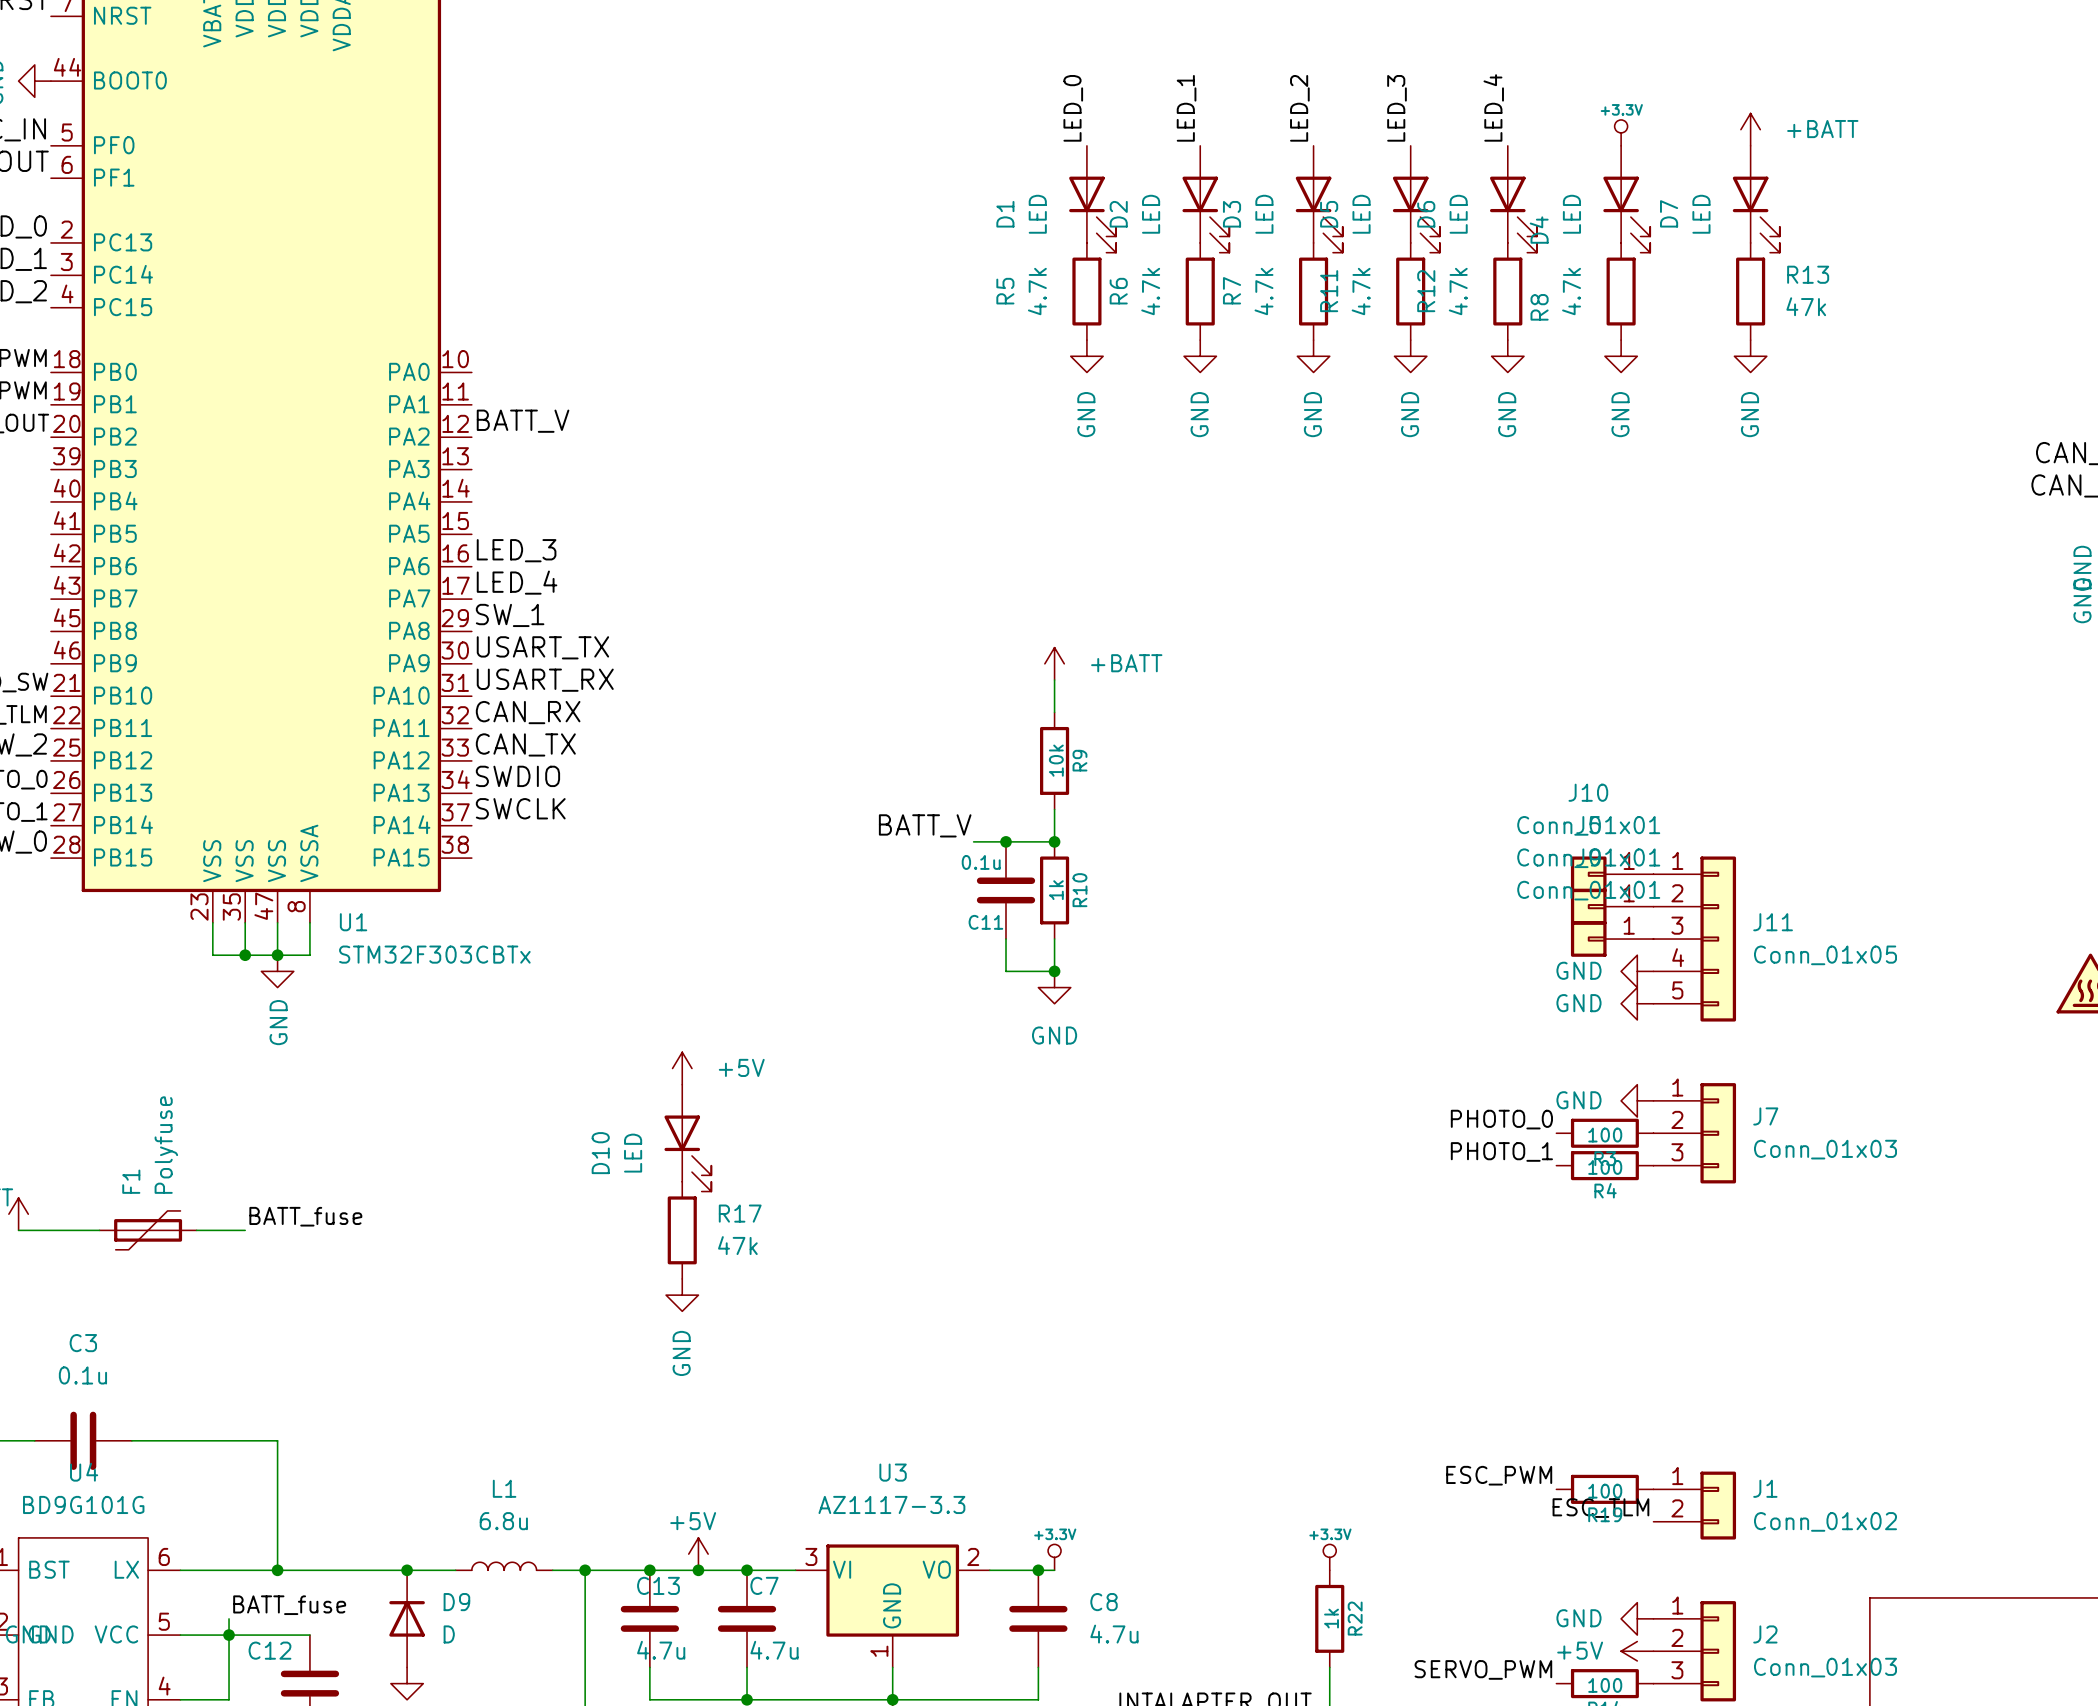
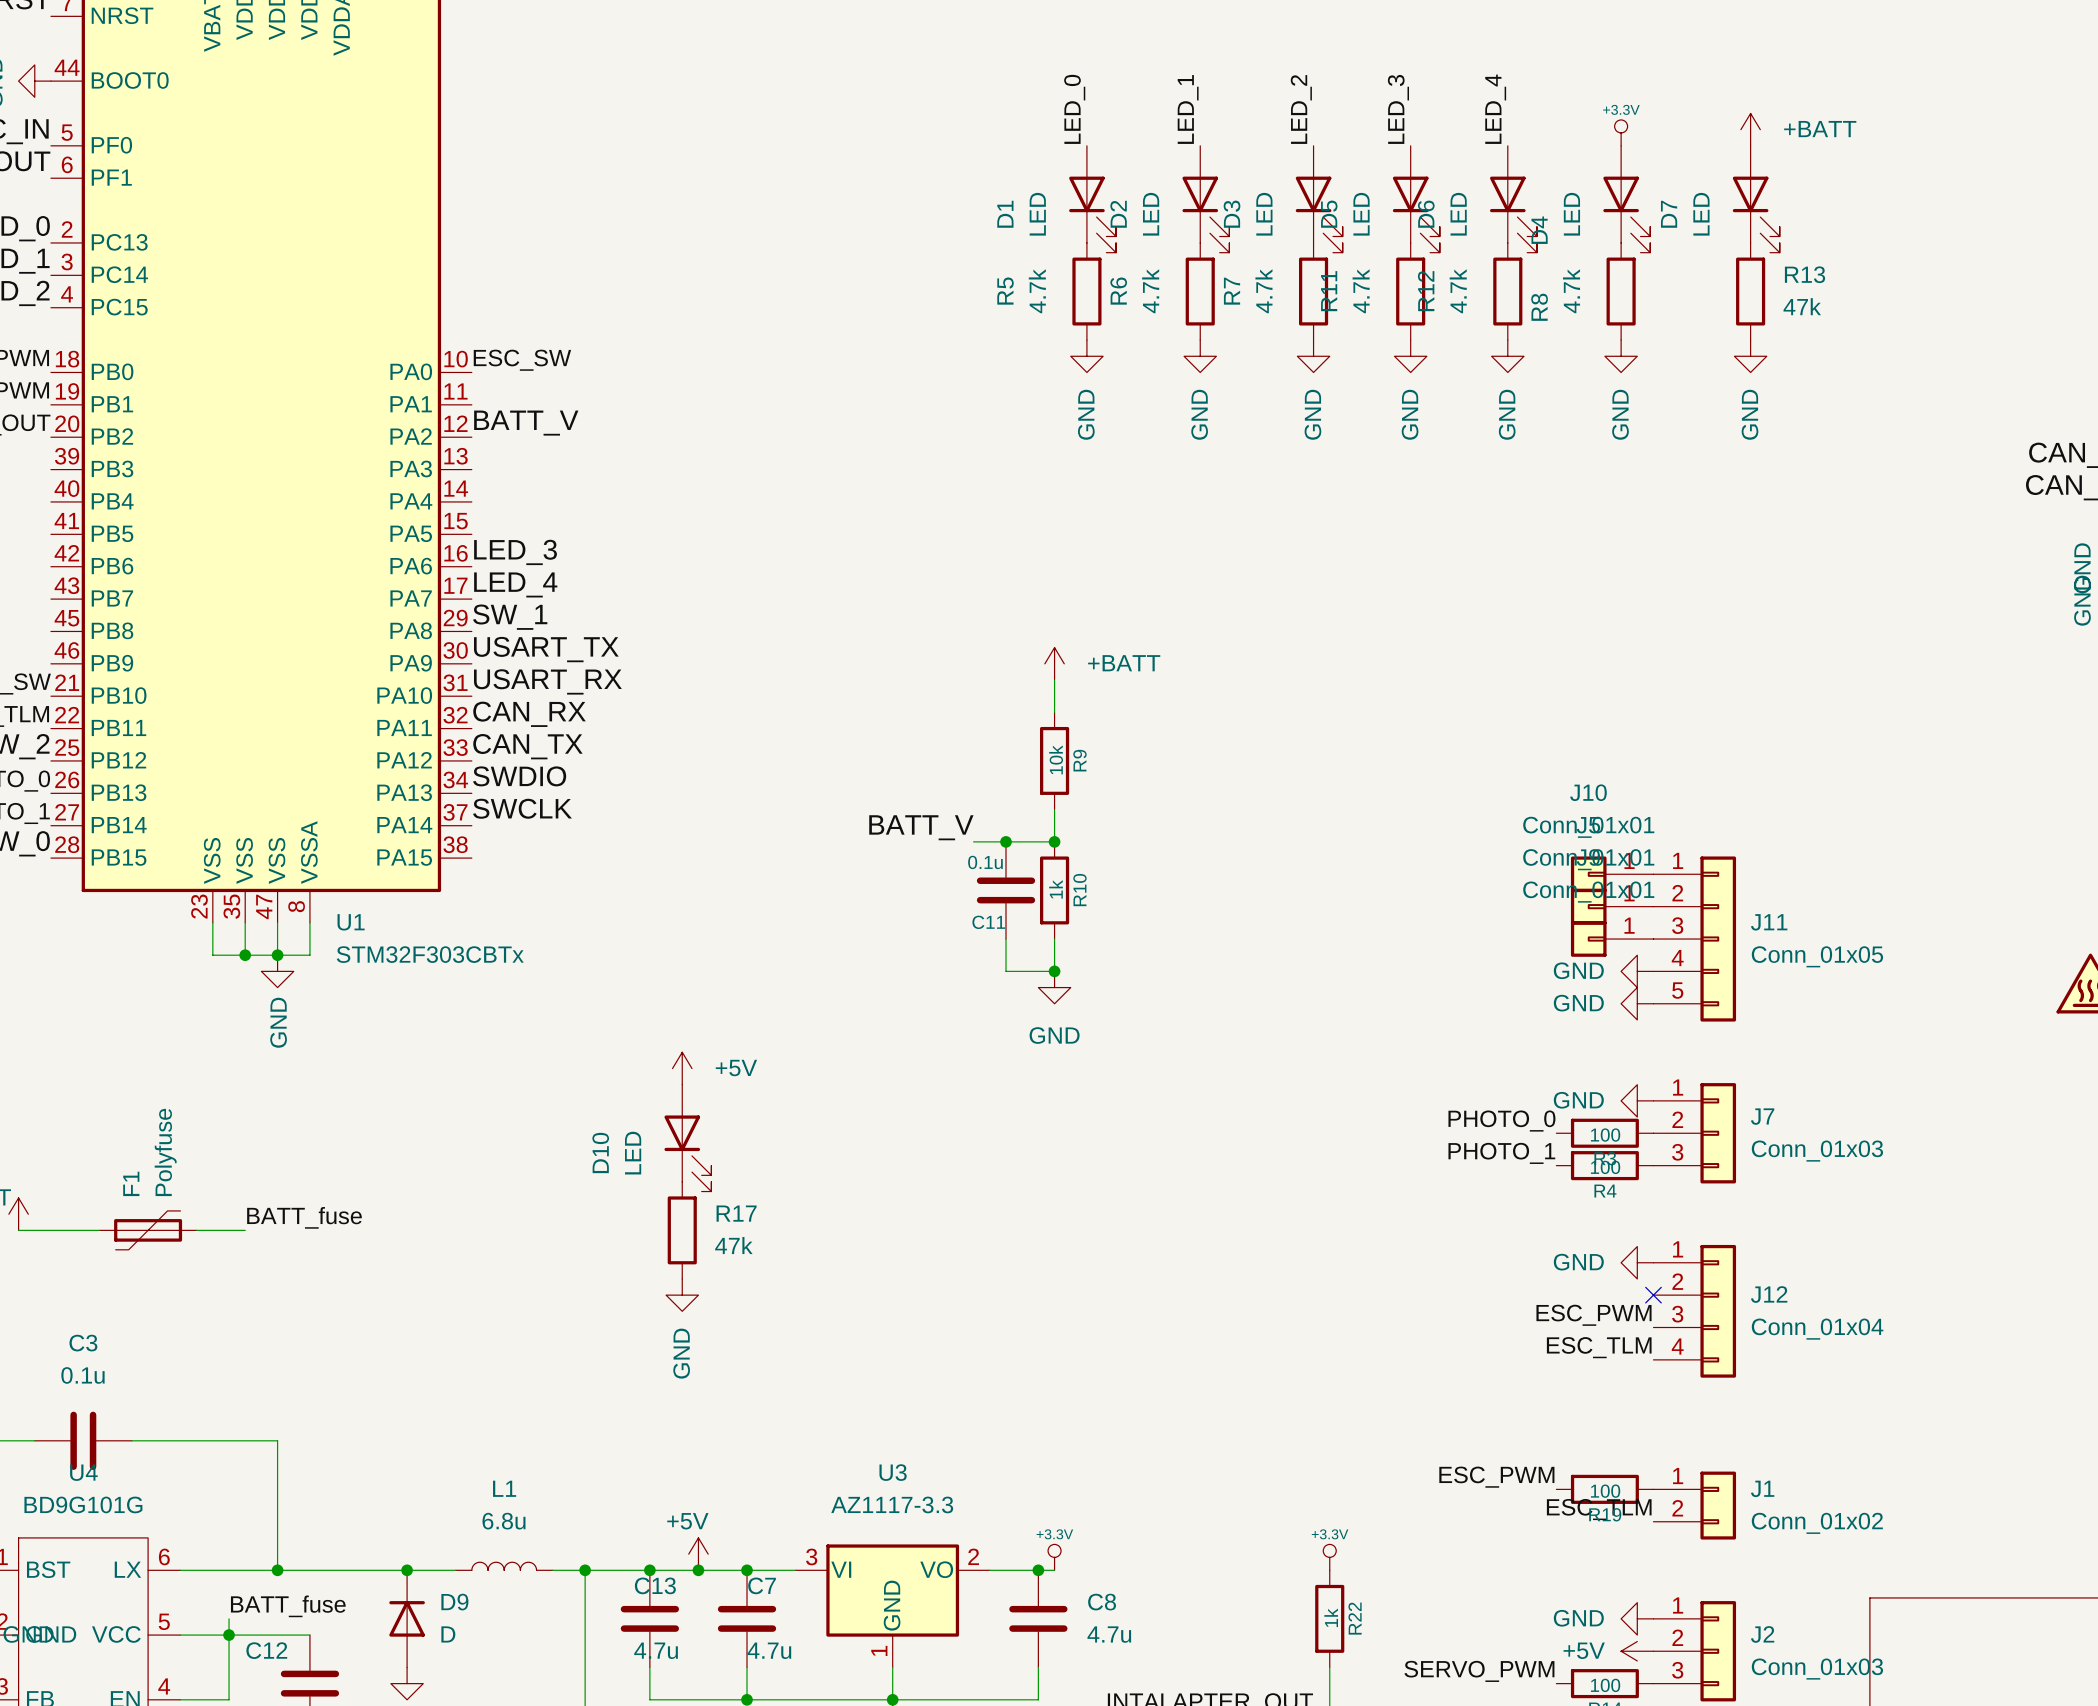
label: none -> ESC_SW (522, 360)
power symbol: none -> GND (1637, 1262)
no-connect mark: none -> (1653, 1295)
J12: none -> Conn_01x04 (1694, 1311)
label: none -> ESC_PWM (1594, 1315)
label: none -> ESC_TLM (1599, 1347)

